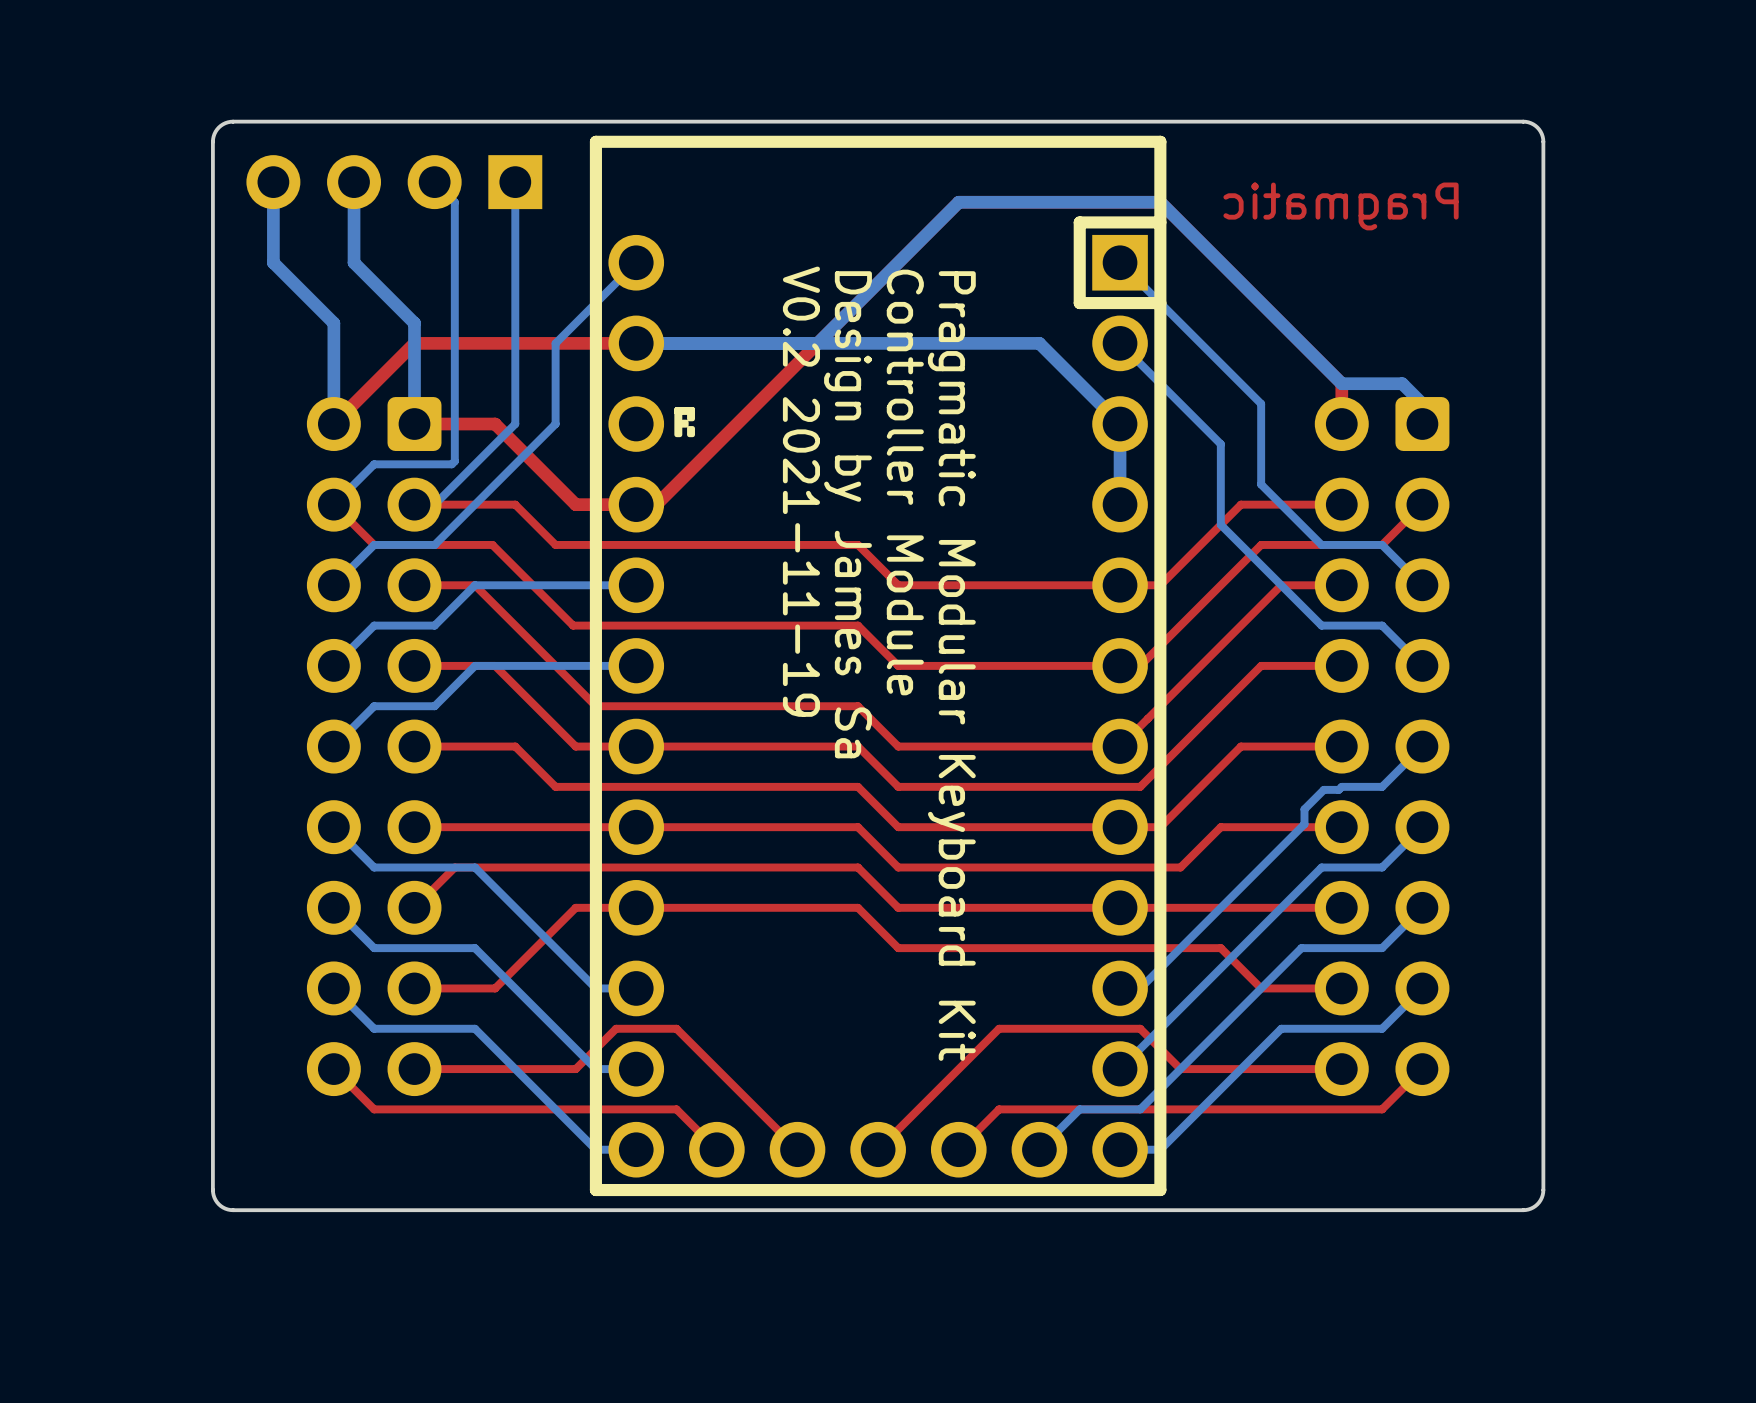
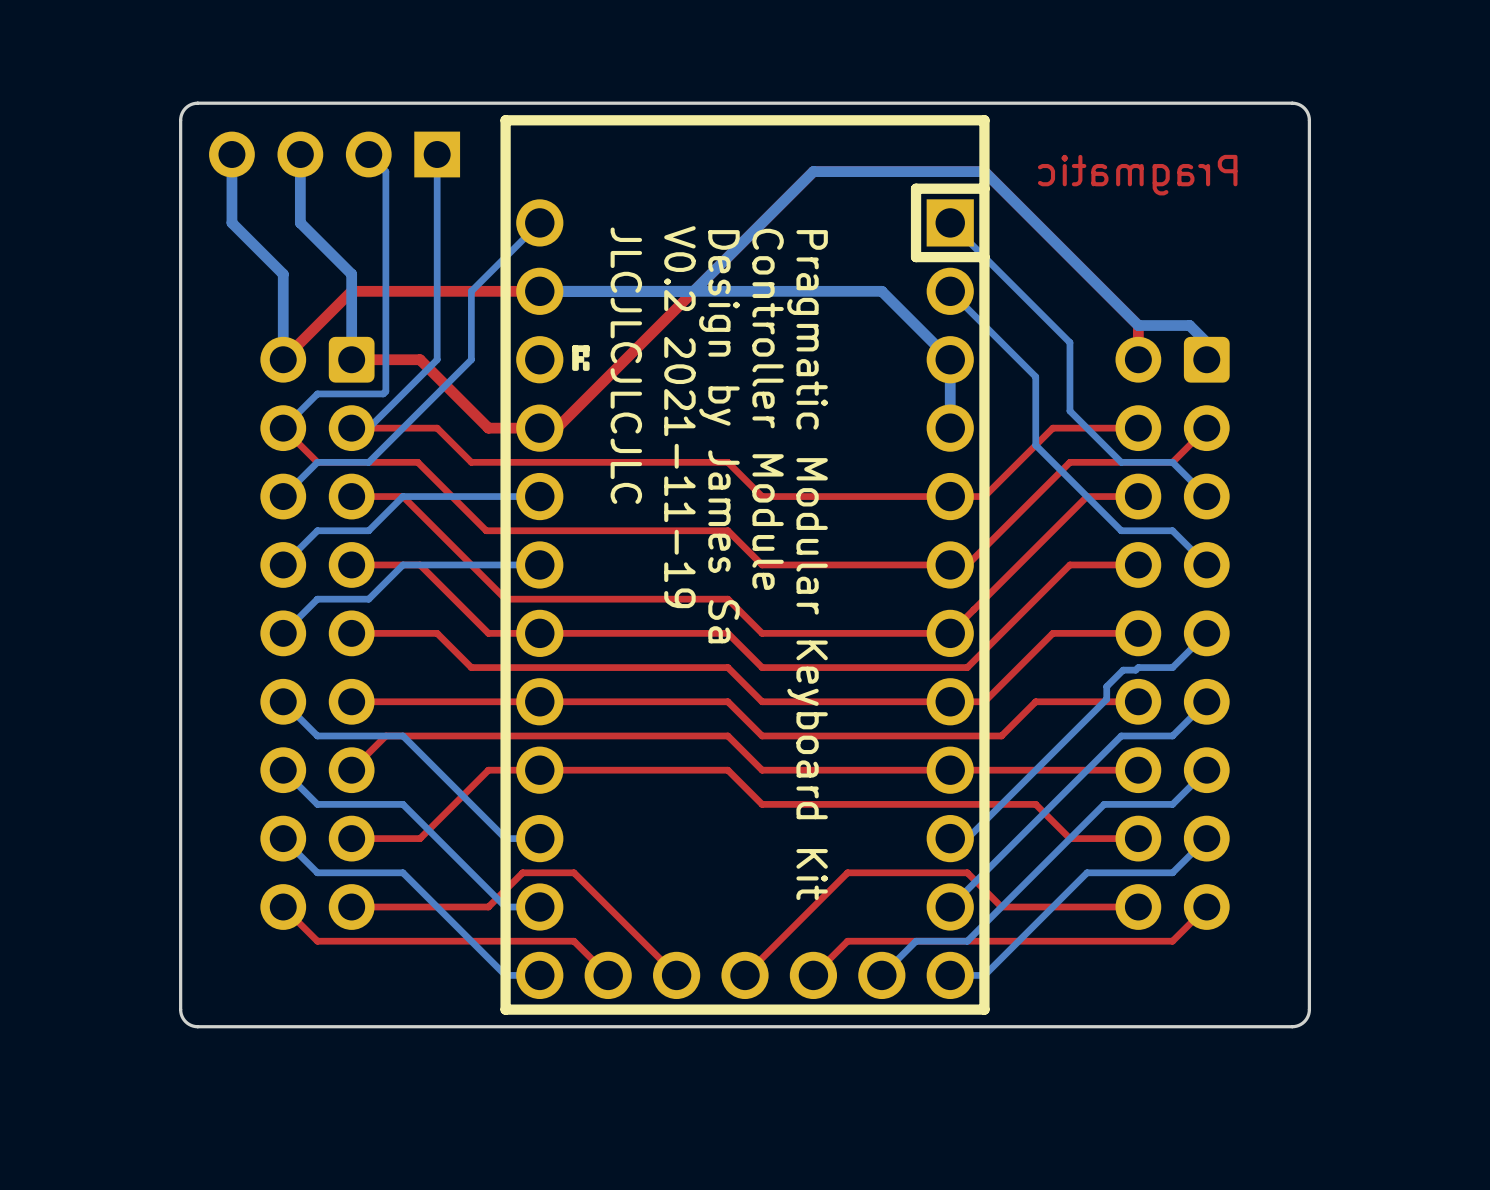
text: none -> JLCJLCJLCJLC (626, 365)

